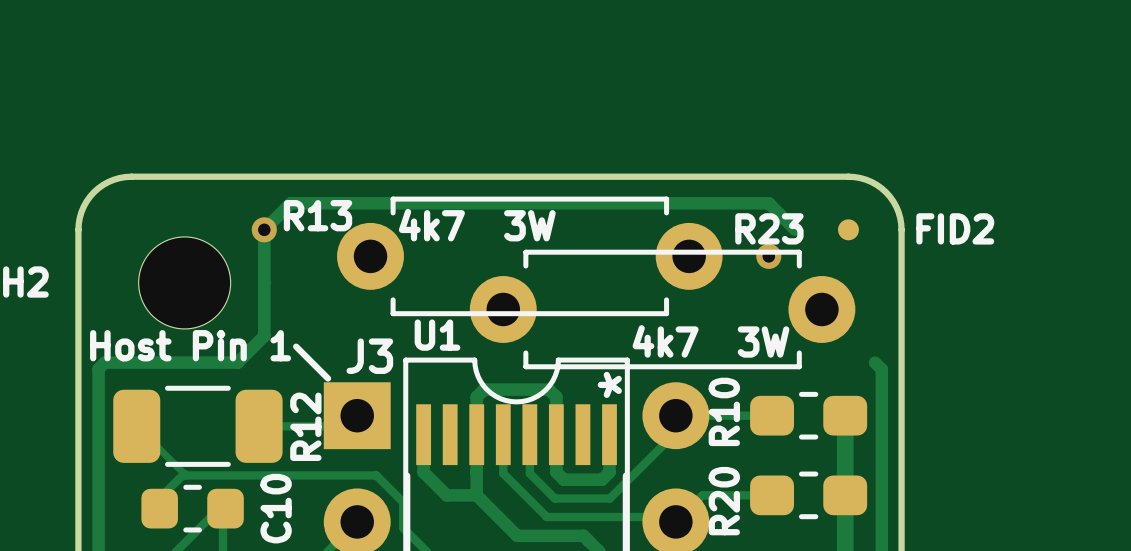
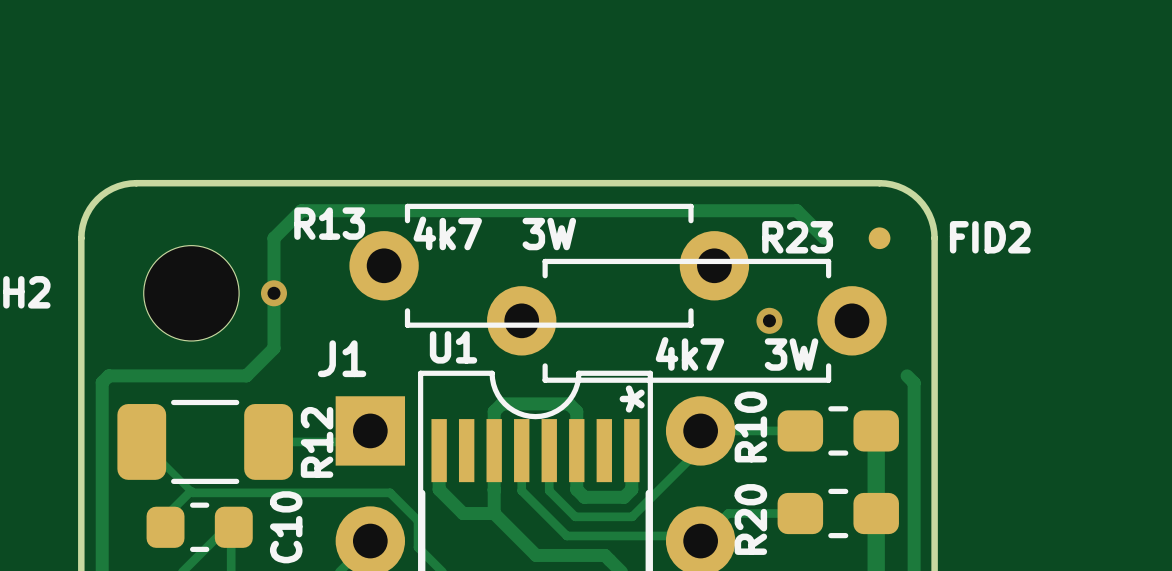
via position: (264, 229) -> (273, 293)
via position: (768, 256) -> (769, 320)
text: Host Pin 1 (190, 345) -> none
line: (296, 346) (328, 378) -> none
J3 name: J3 (369, 356) -> J1 (342, 358)

